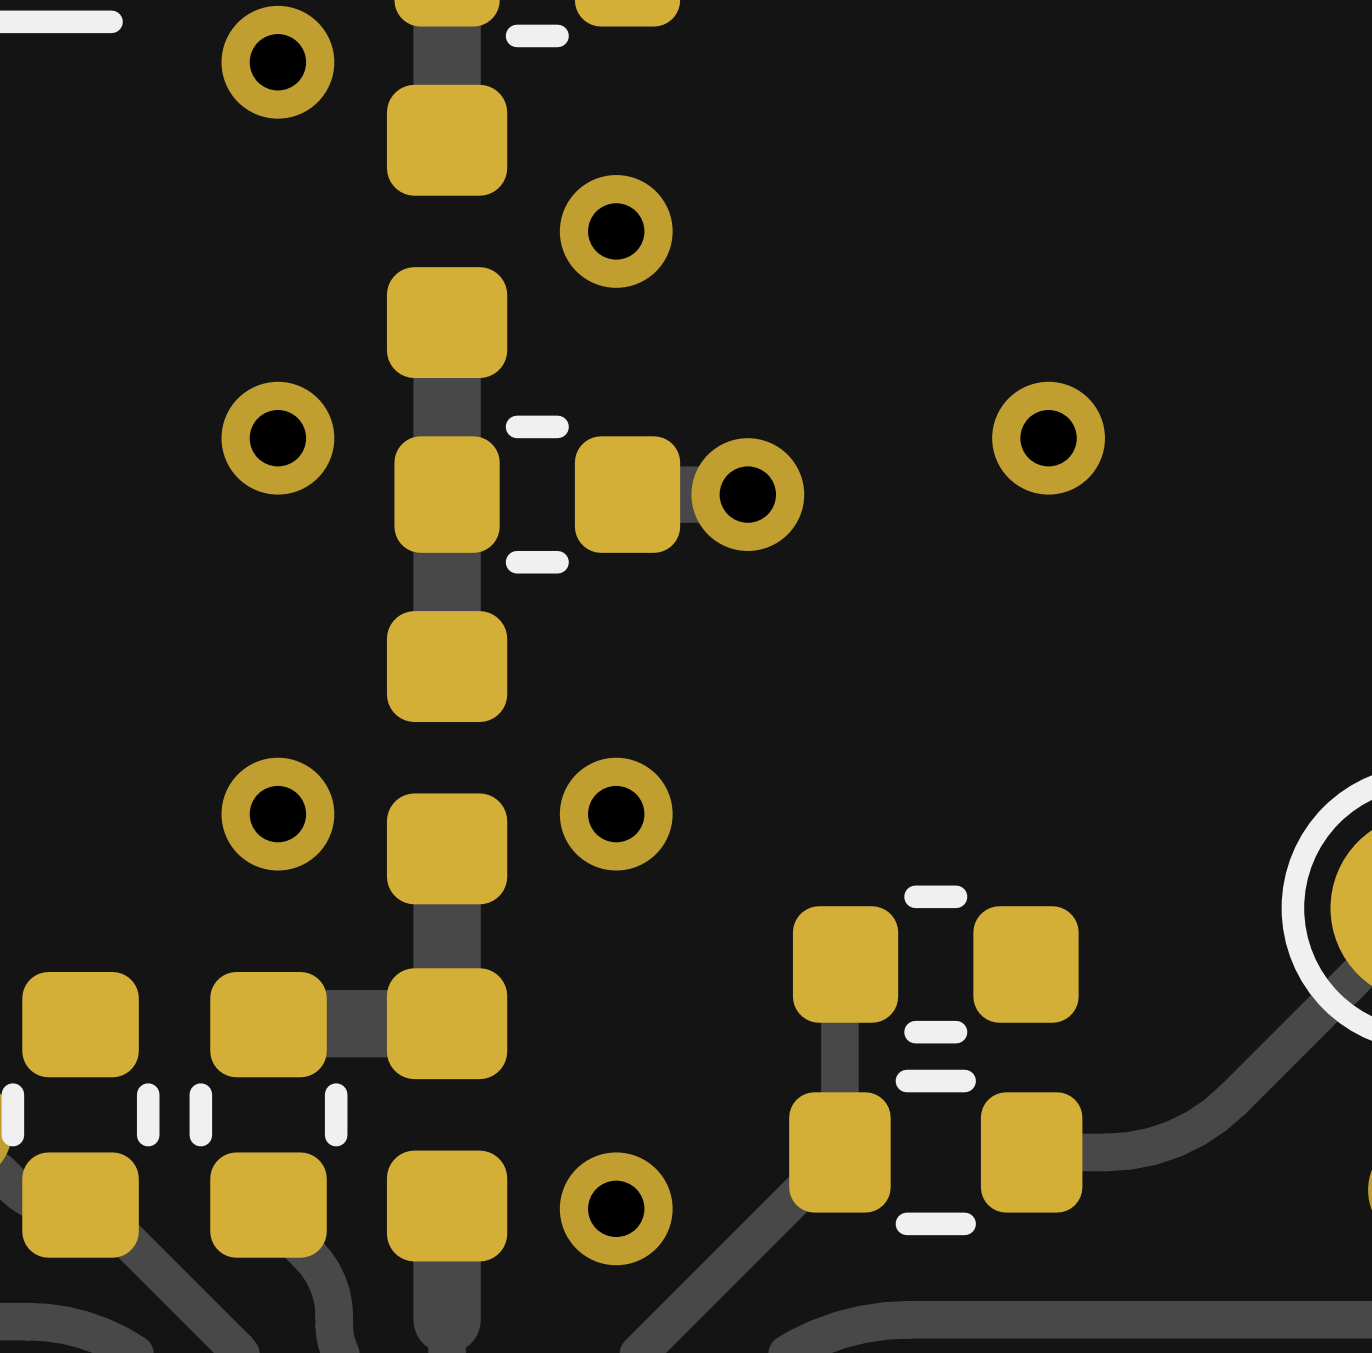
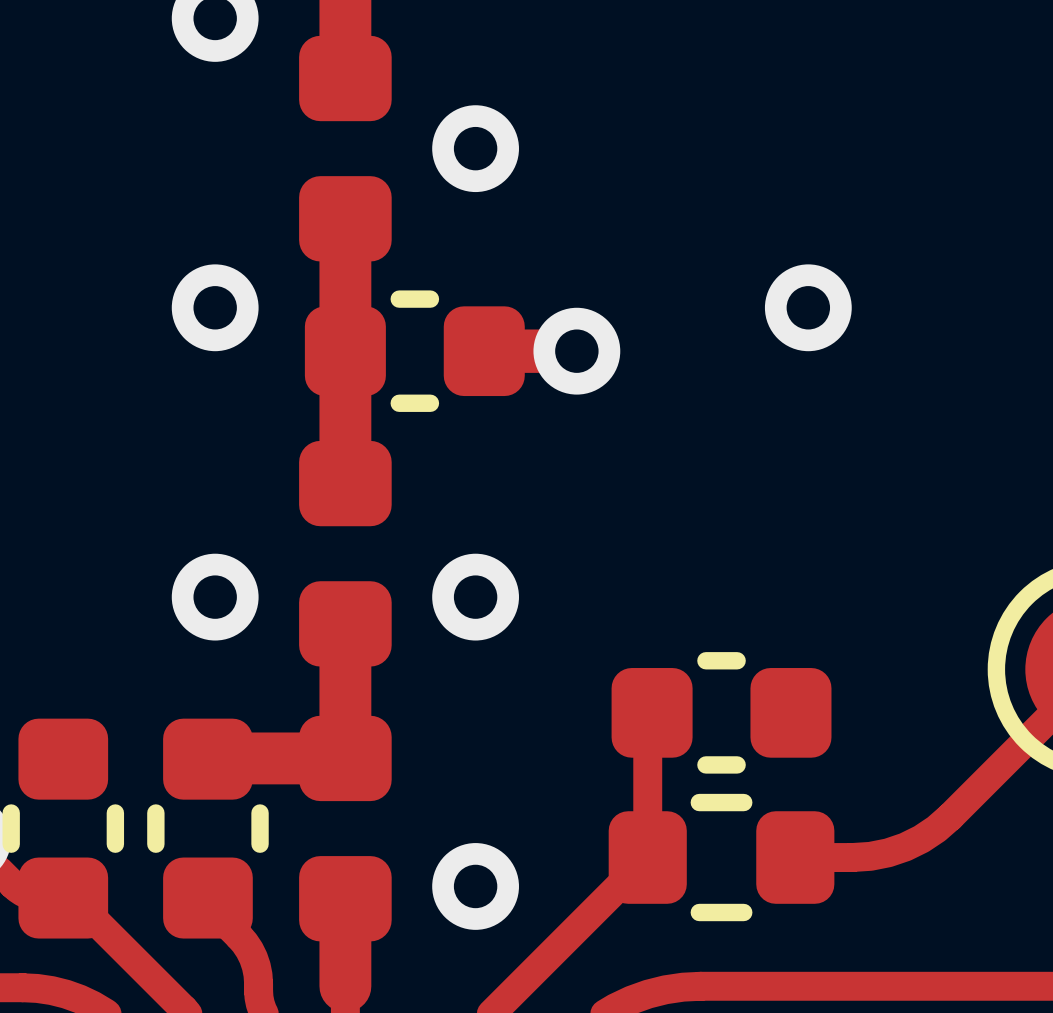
via position: (616, 1208) -> (475, 886)

